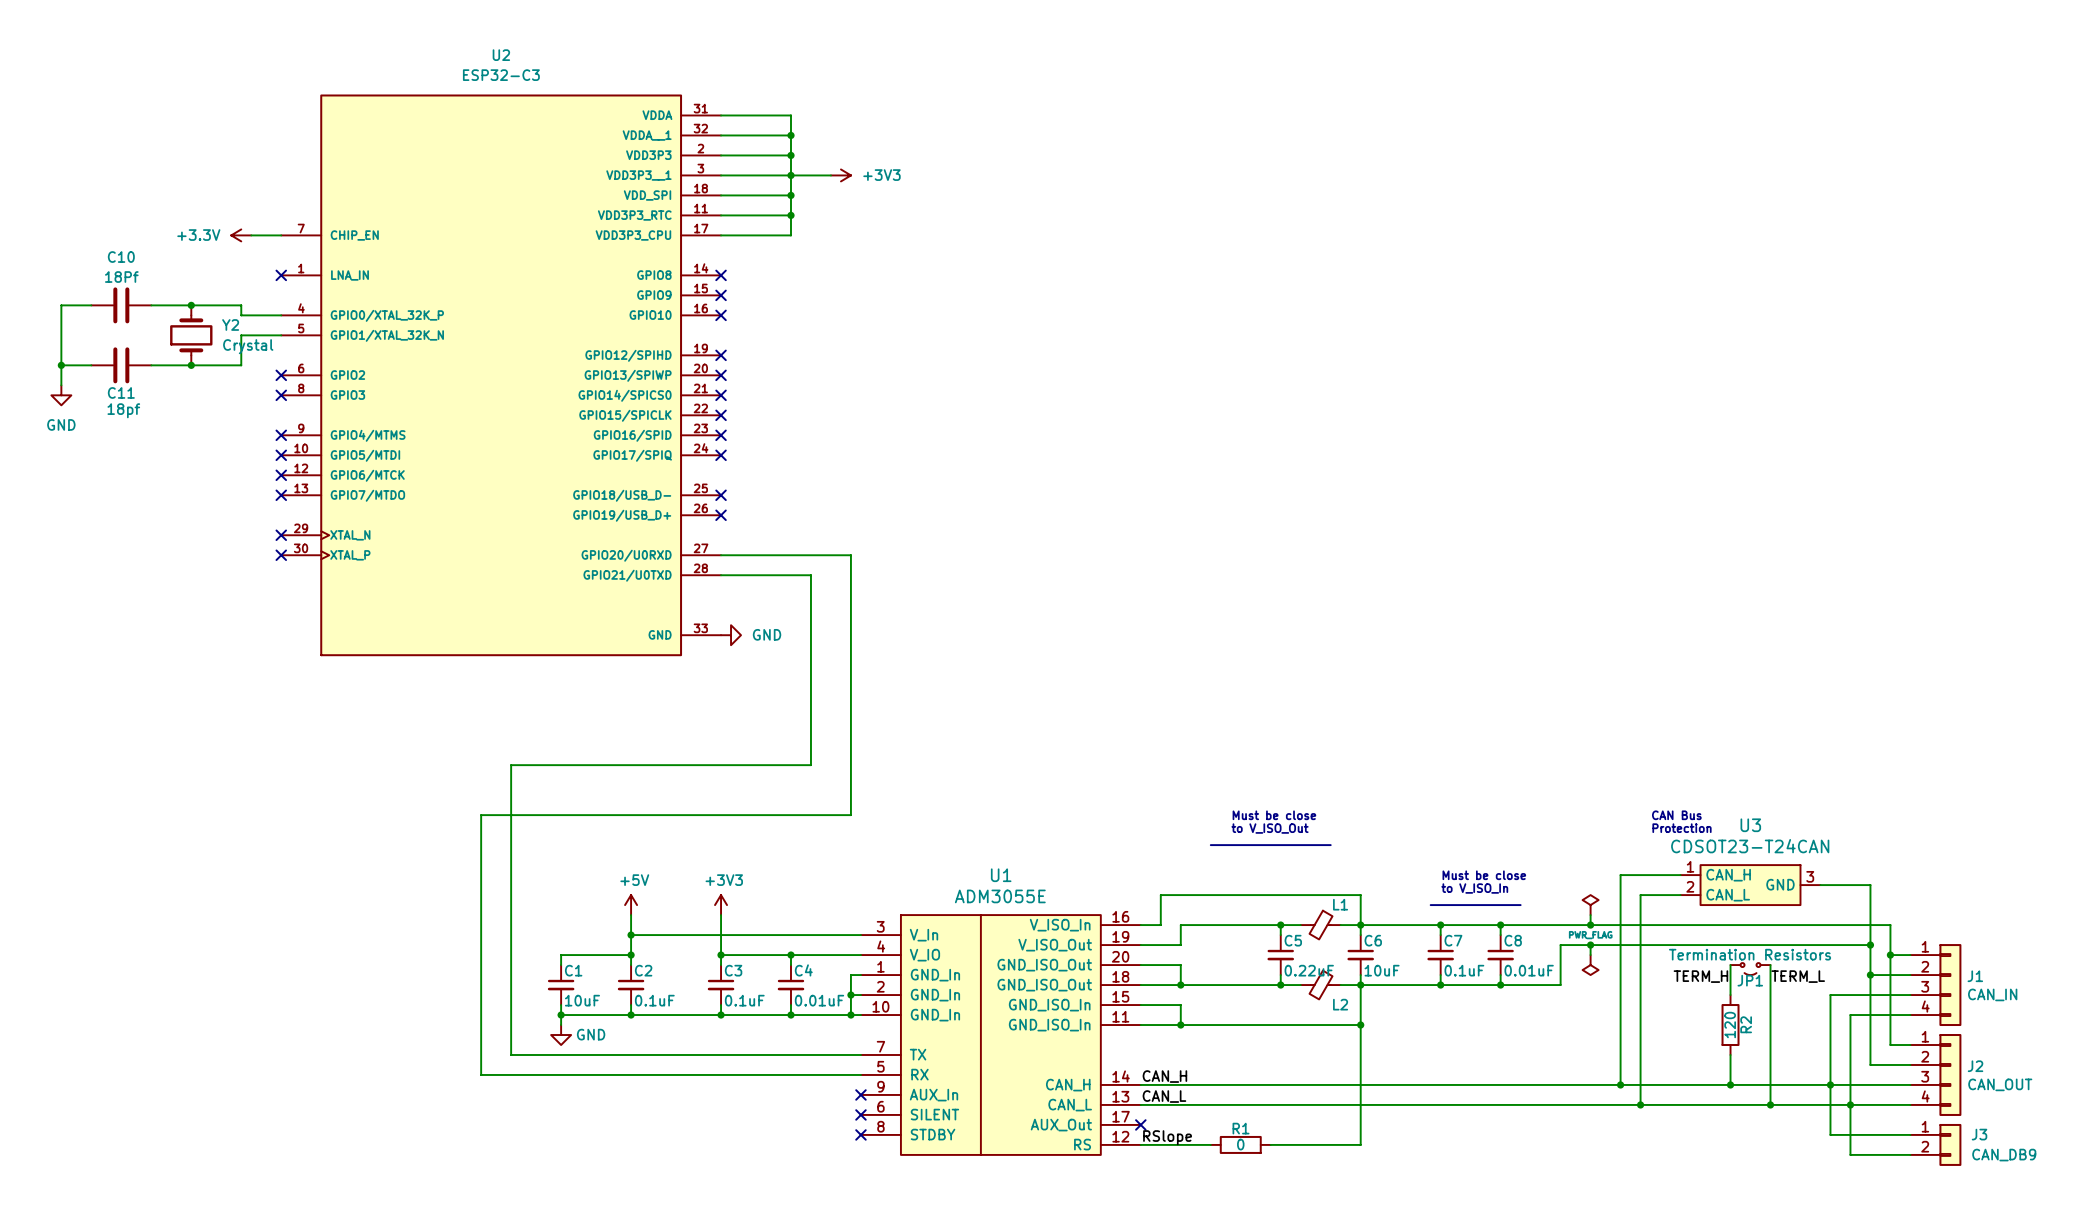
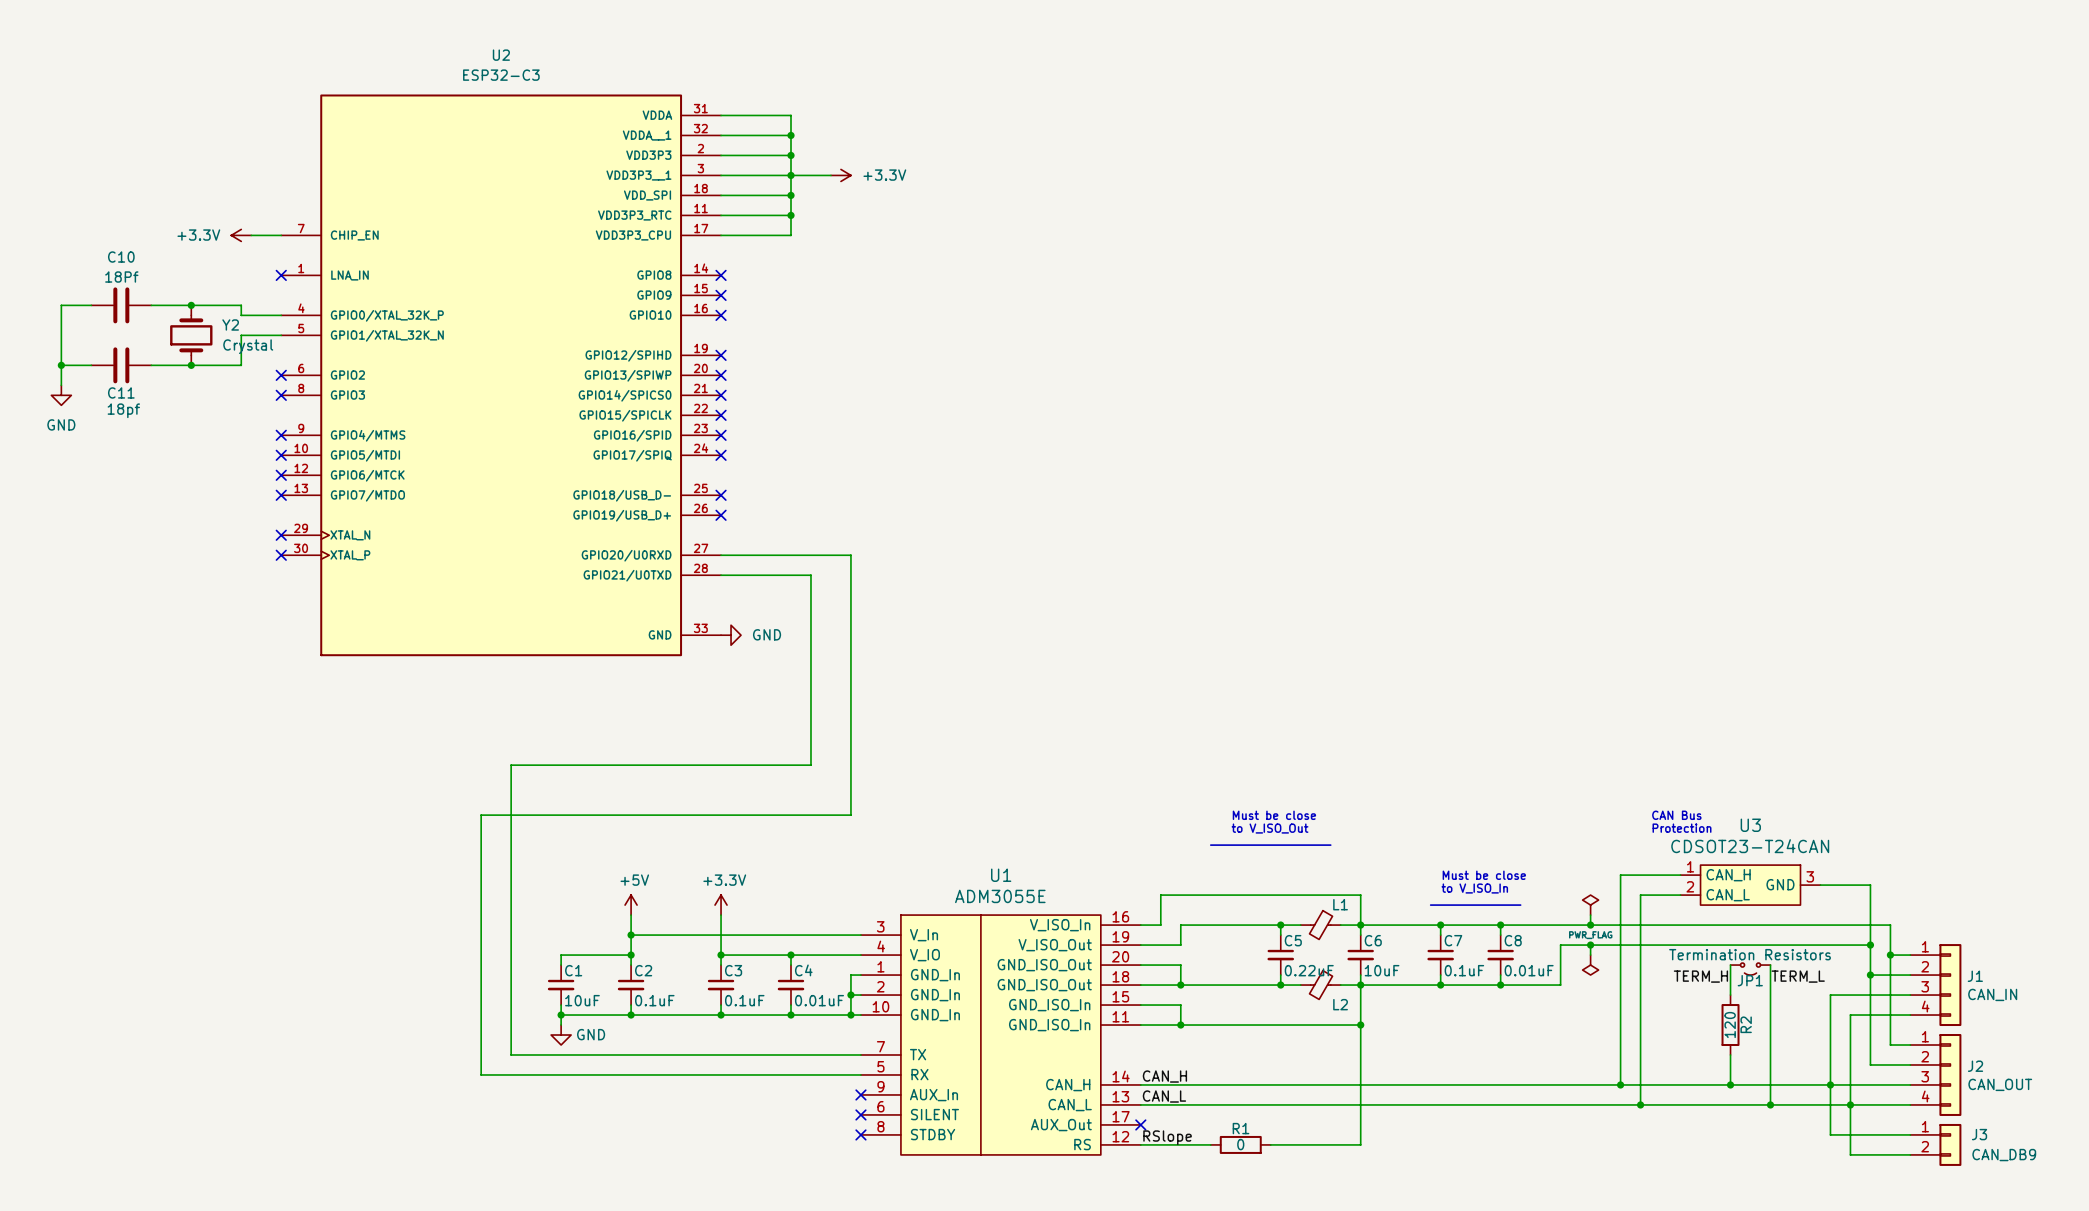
power symbol: +3V3 (840, 175) -> +3.3V (840, 175)
power symbol: +3V3 (721, 905) -> +3.3V (721, 905)

